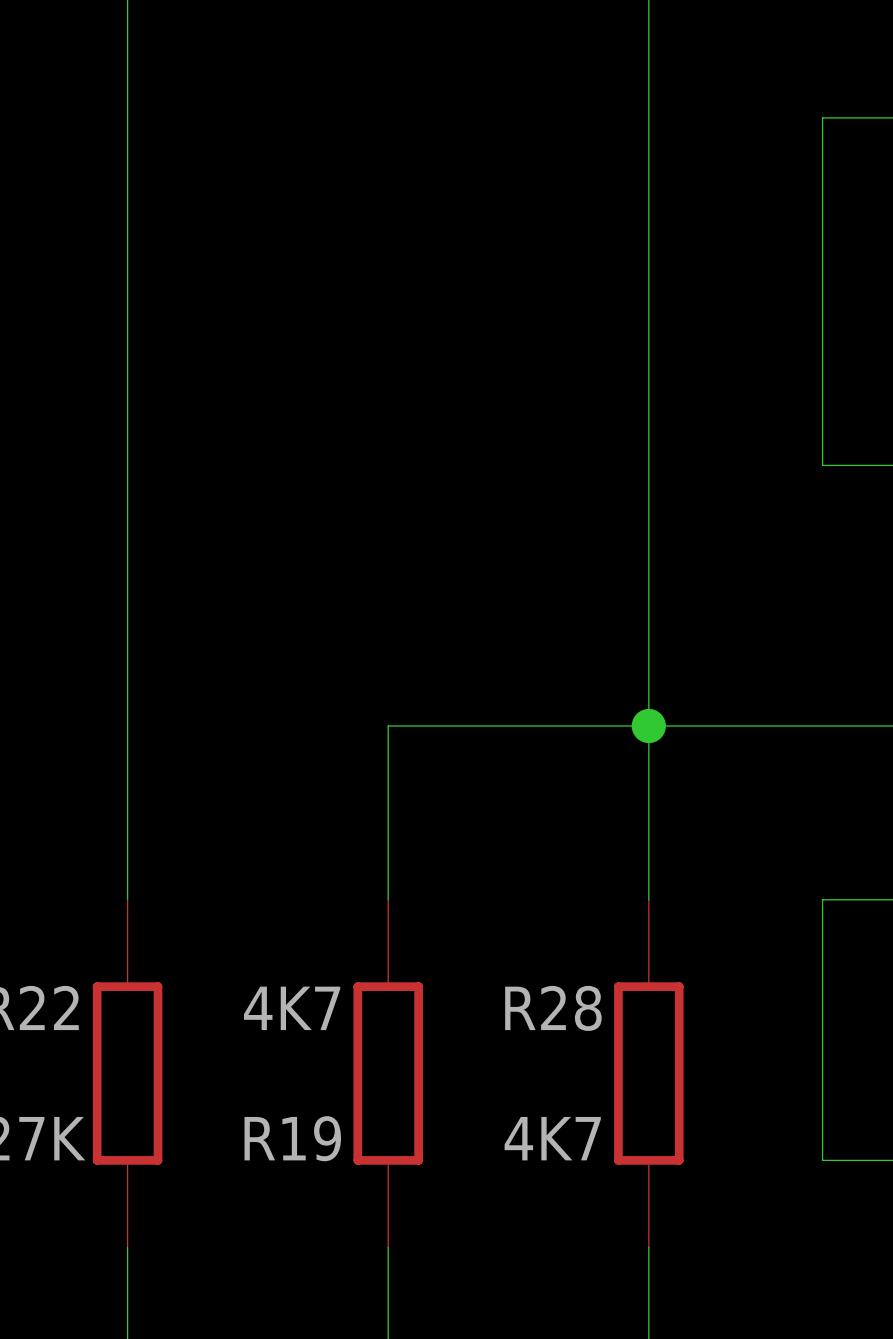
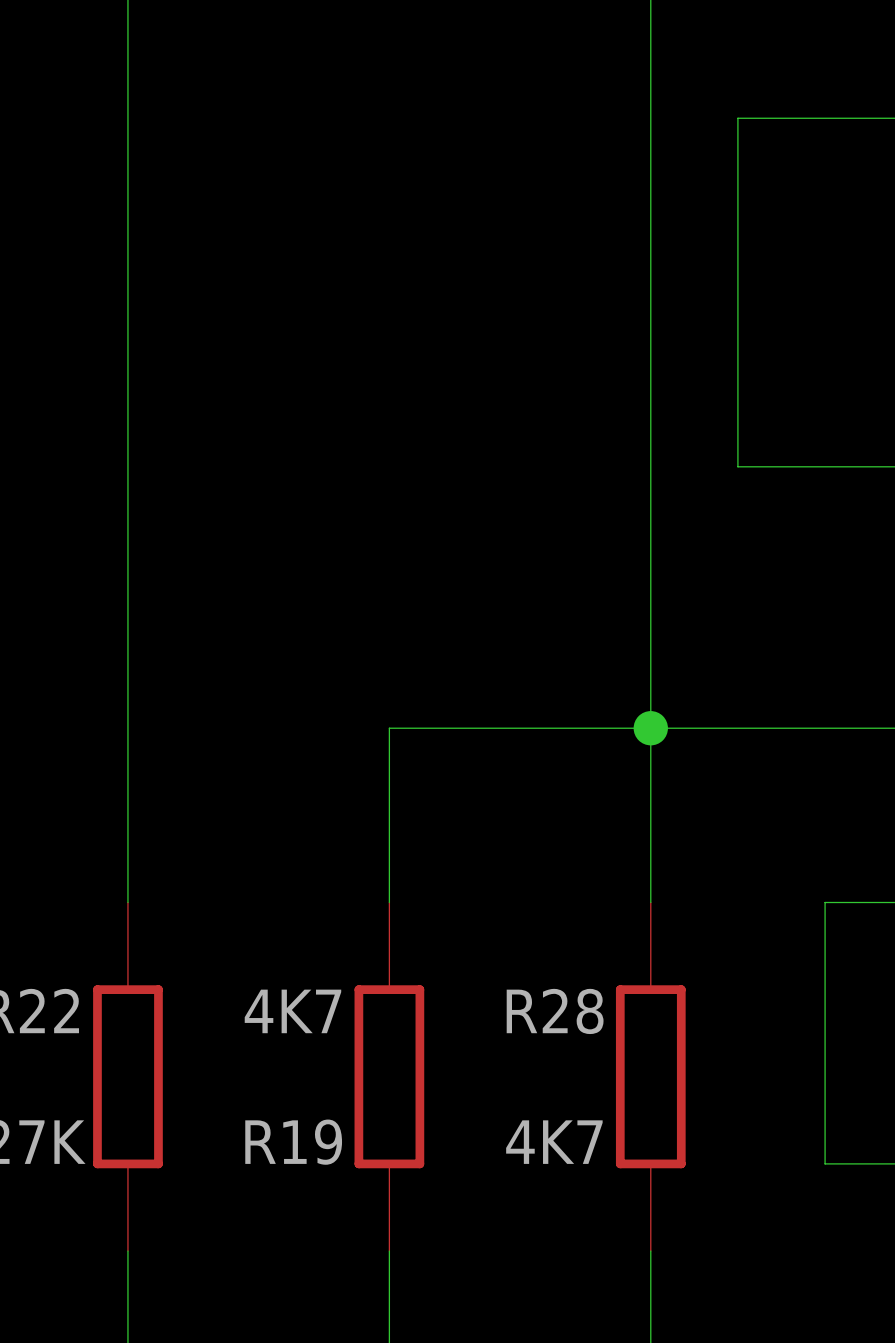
wire: (822, 117) (822, 465) -> (825, 118) (737, 118) (737, 466) (825, 466)

